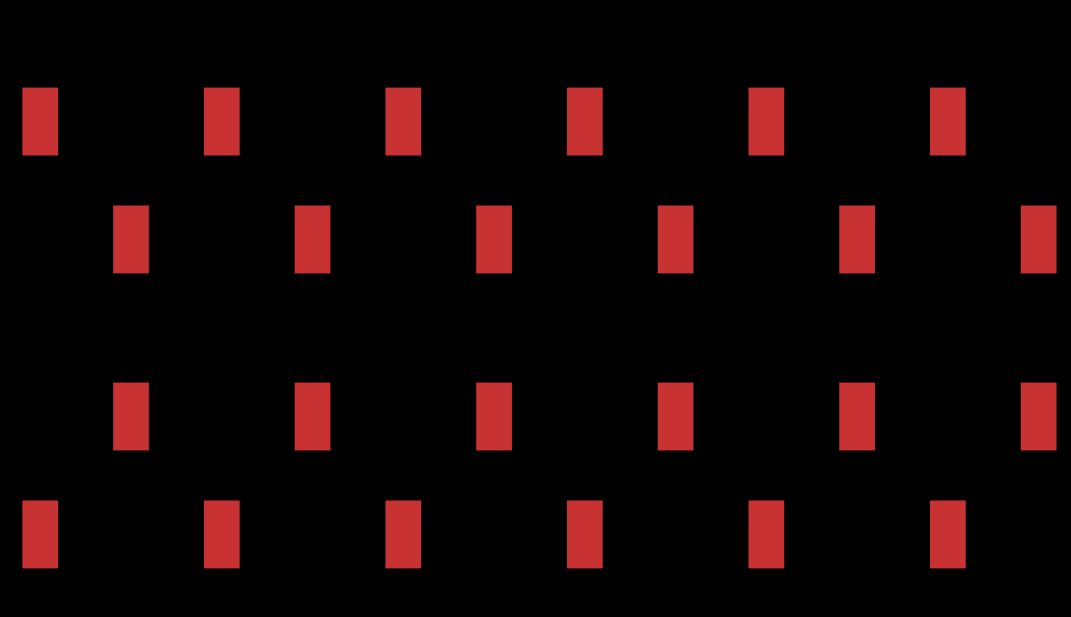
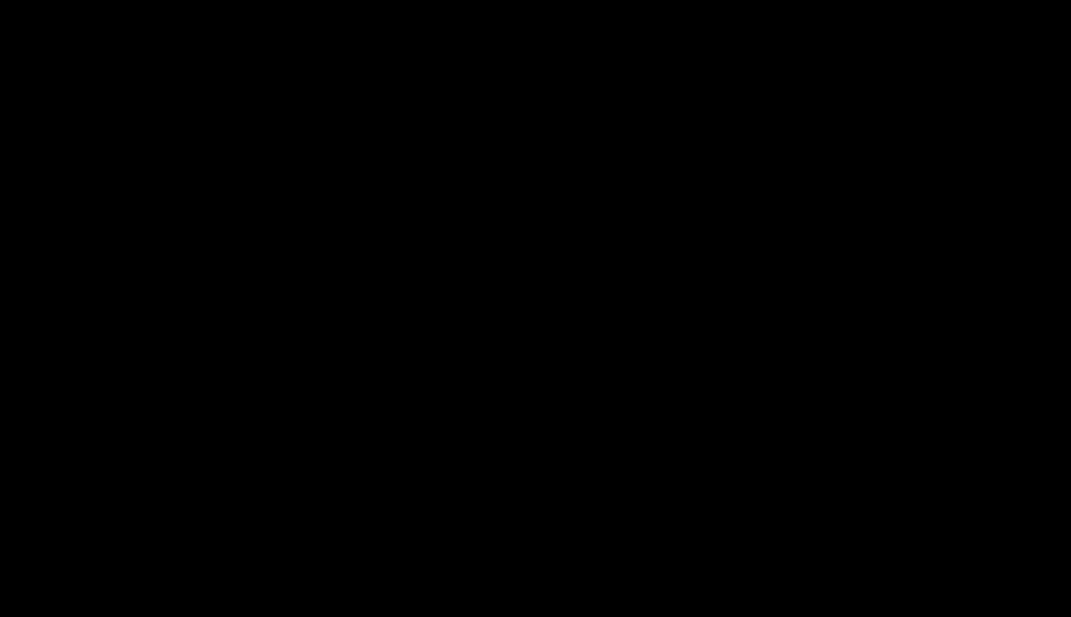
part: (539, 180) -> none
part: (539, 475) -> none

